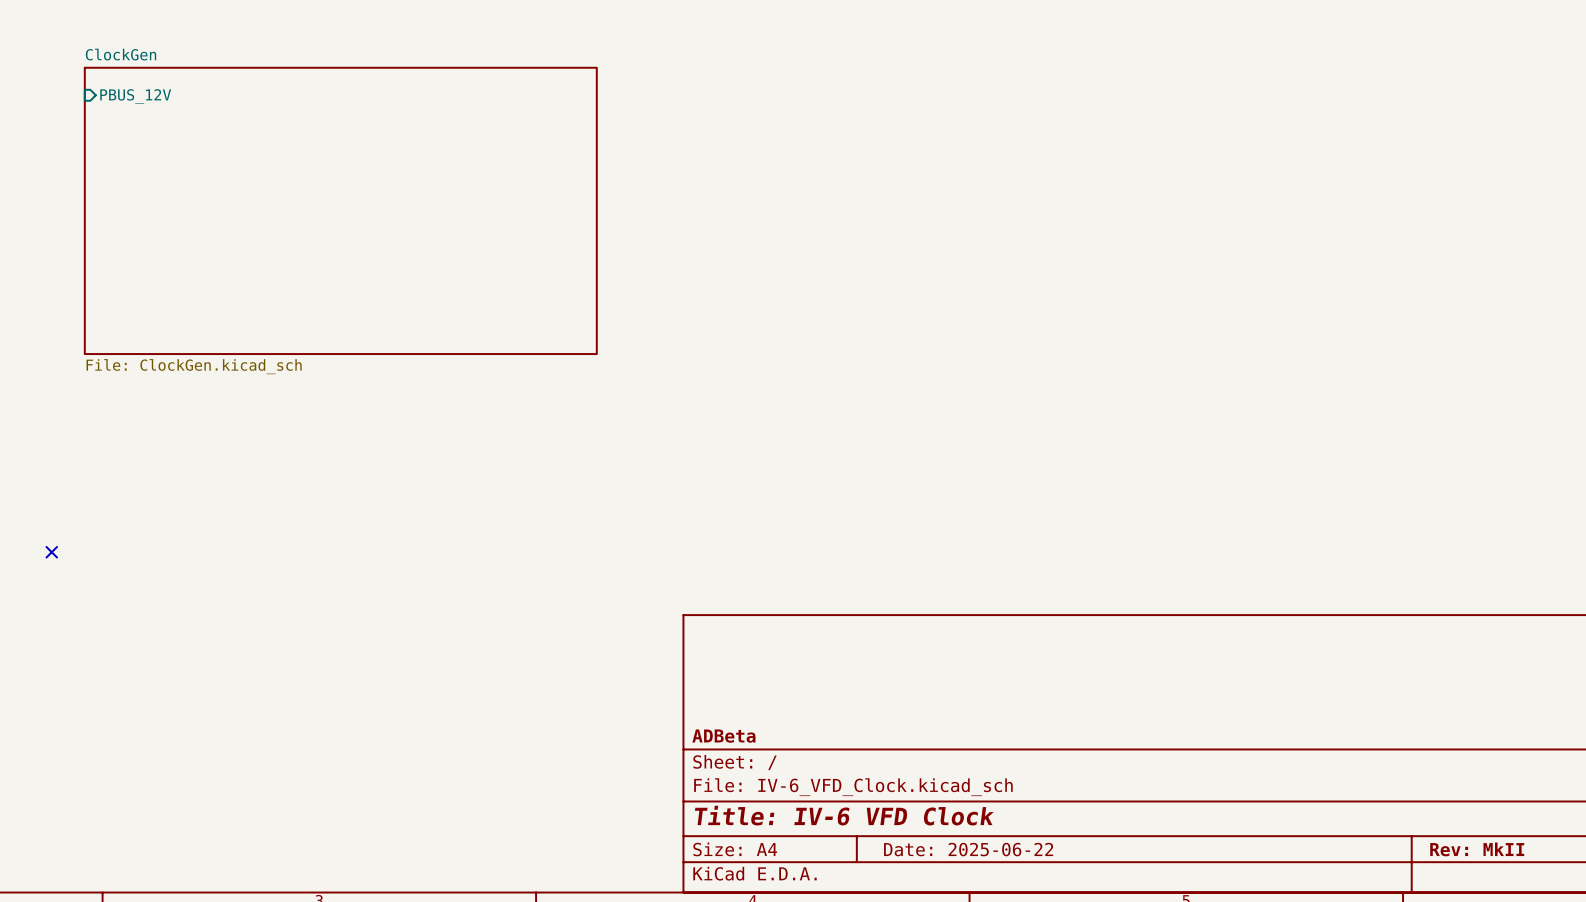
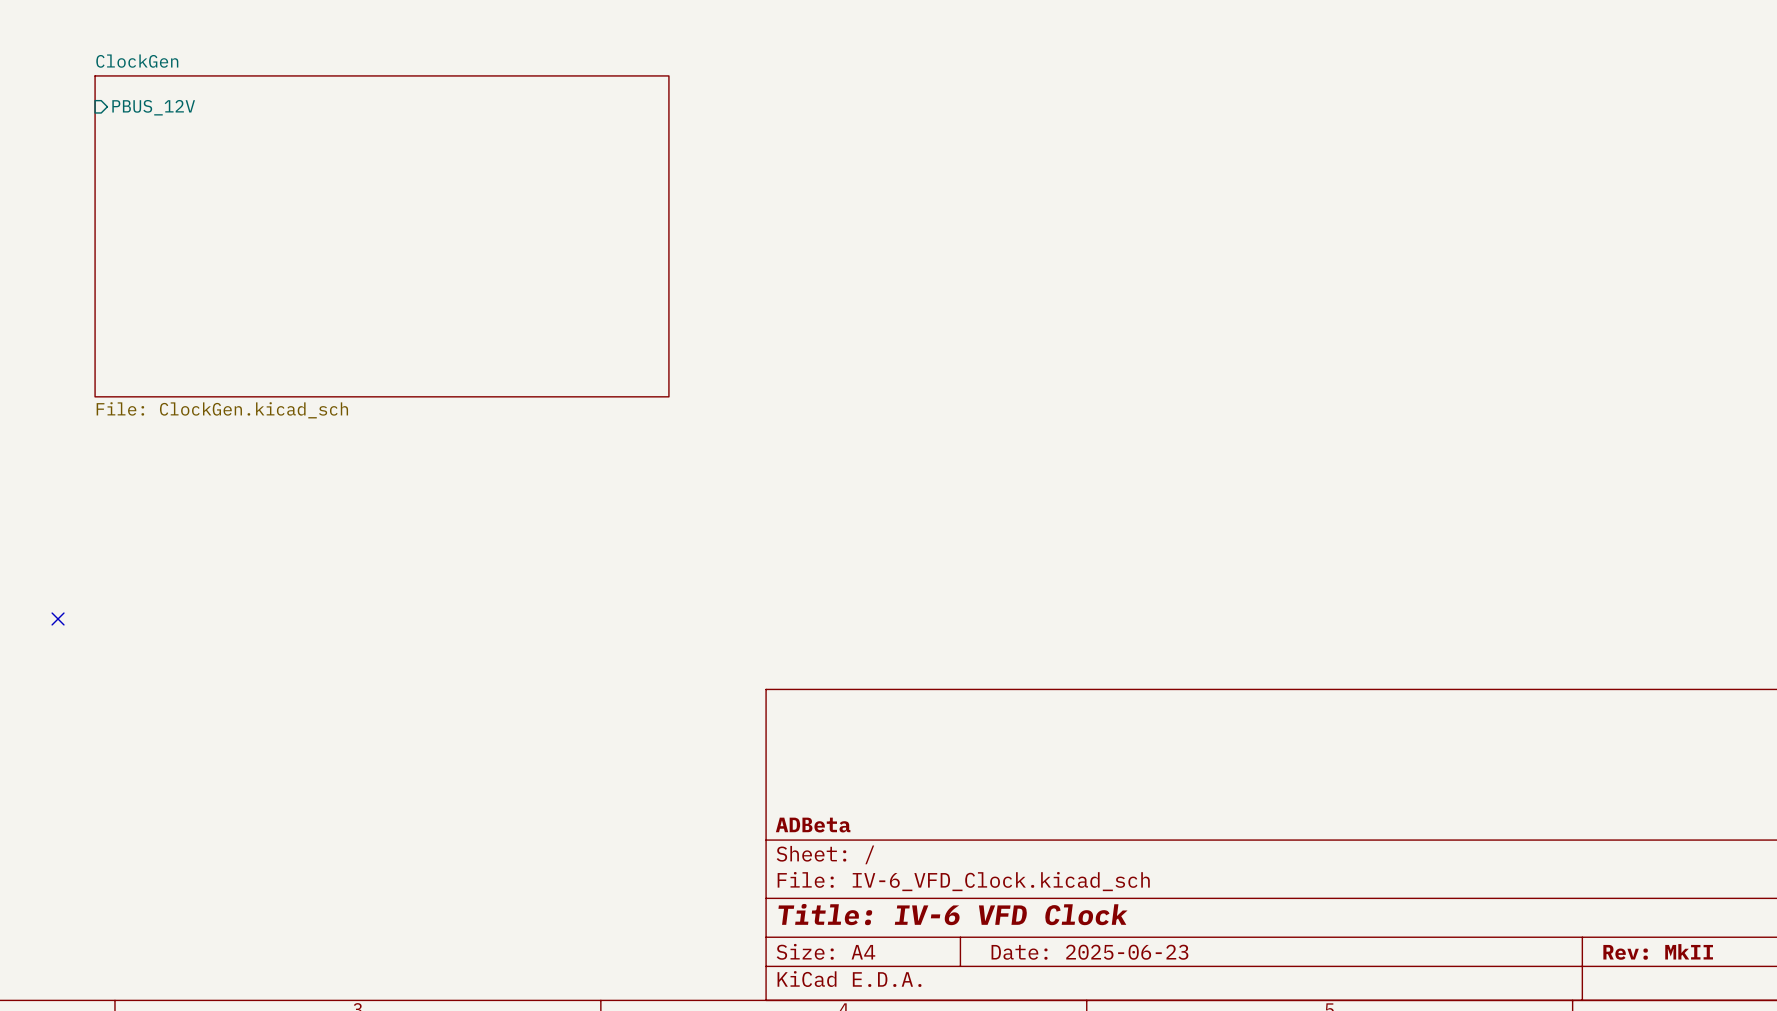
title block: Date: 2025-06-22 (968, 849) -> Date: 2025-06-23 (1089, 952)

